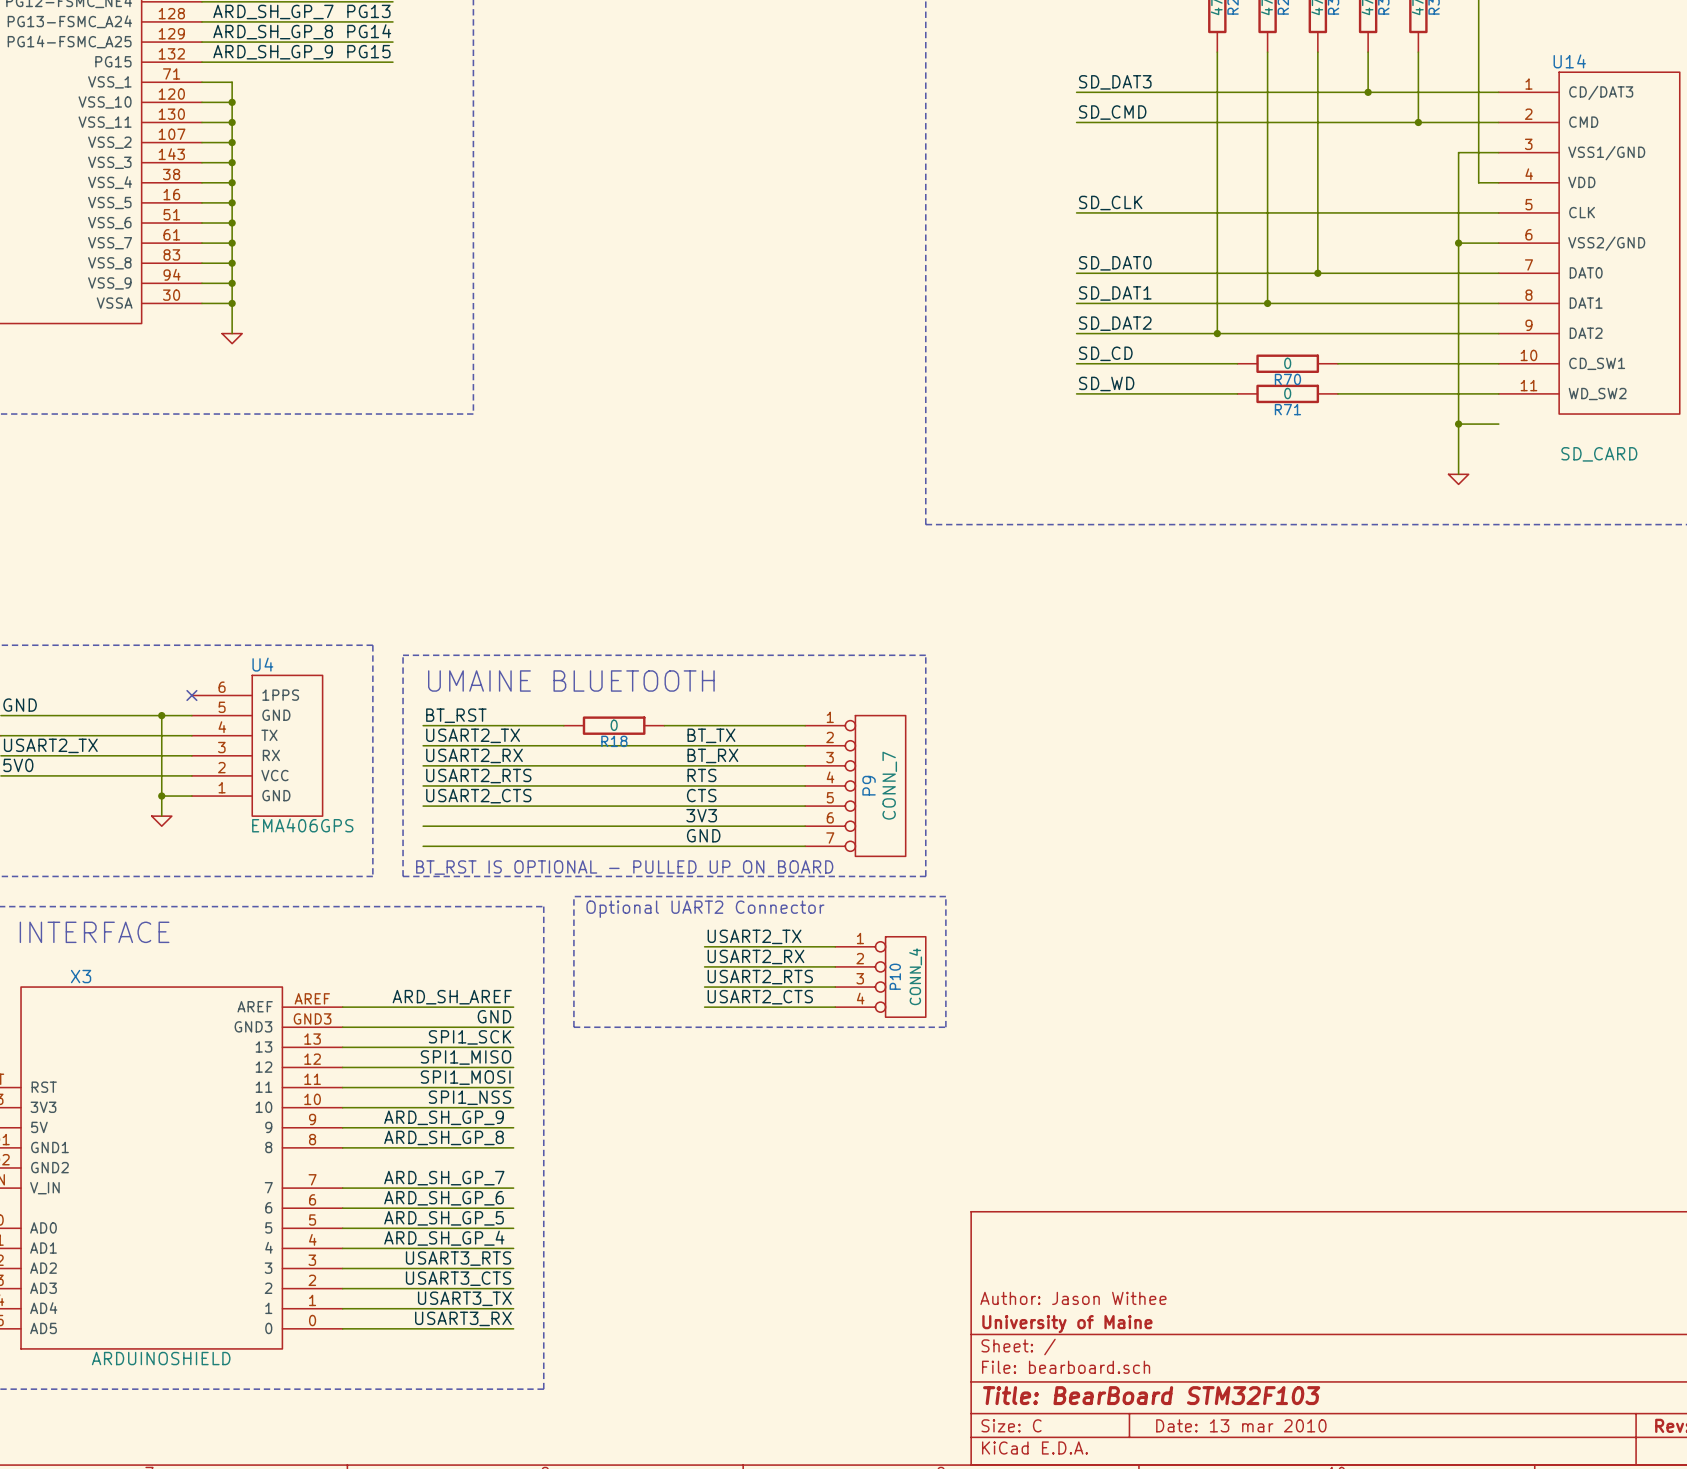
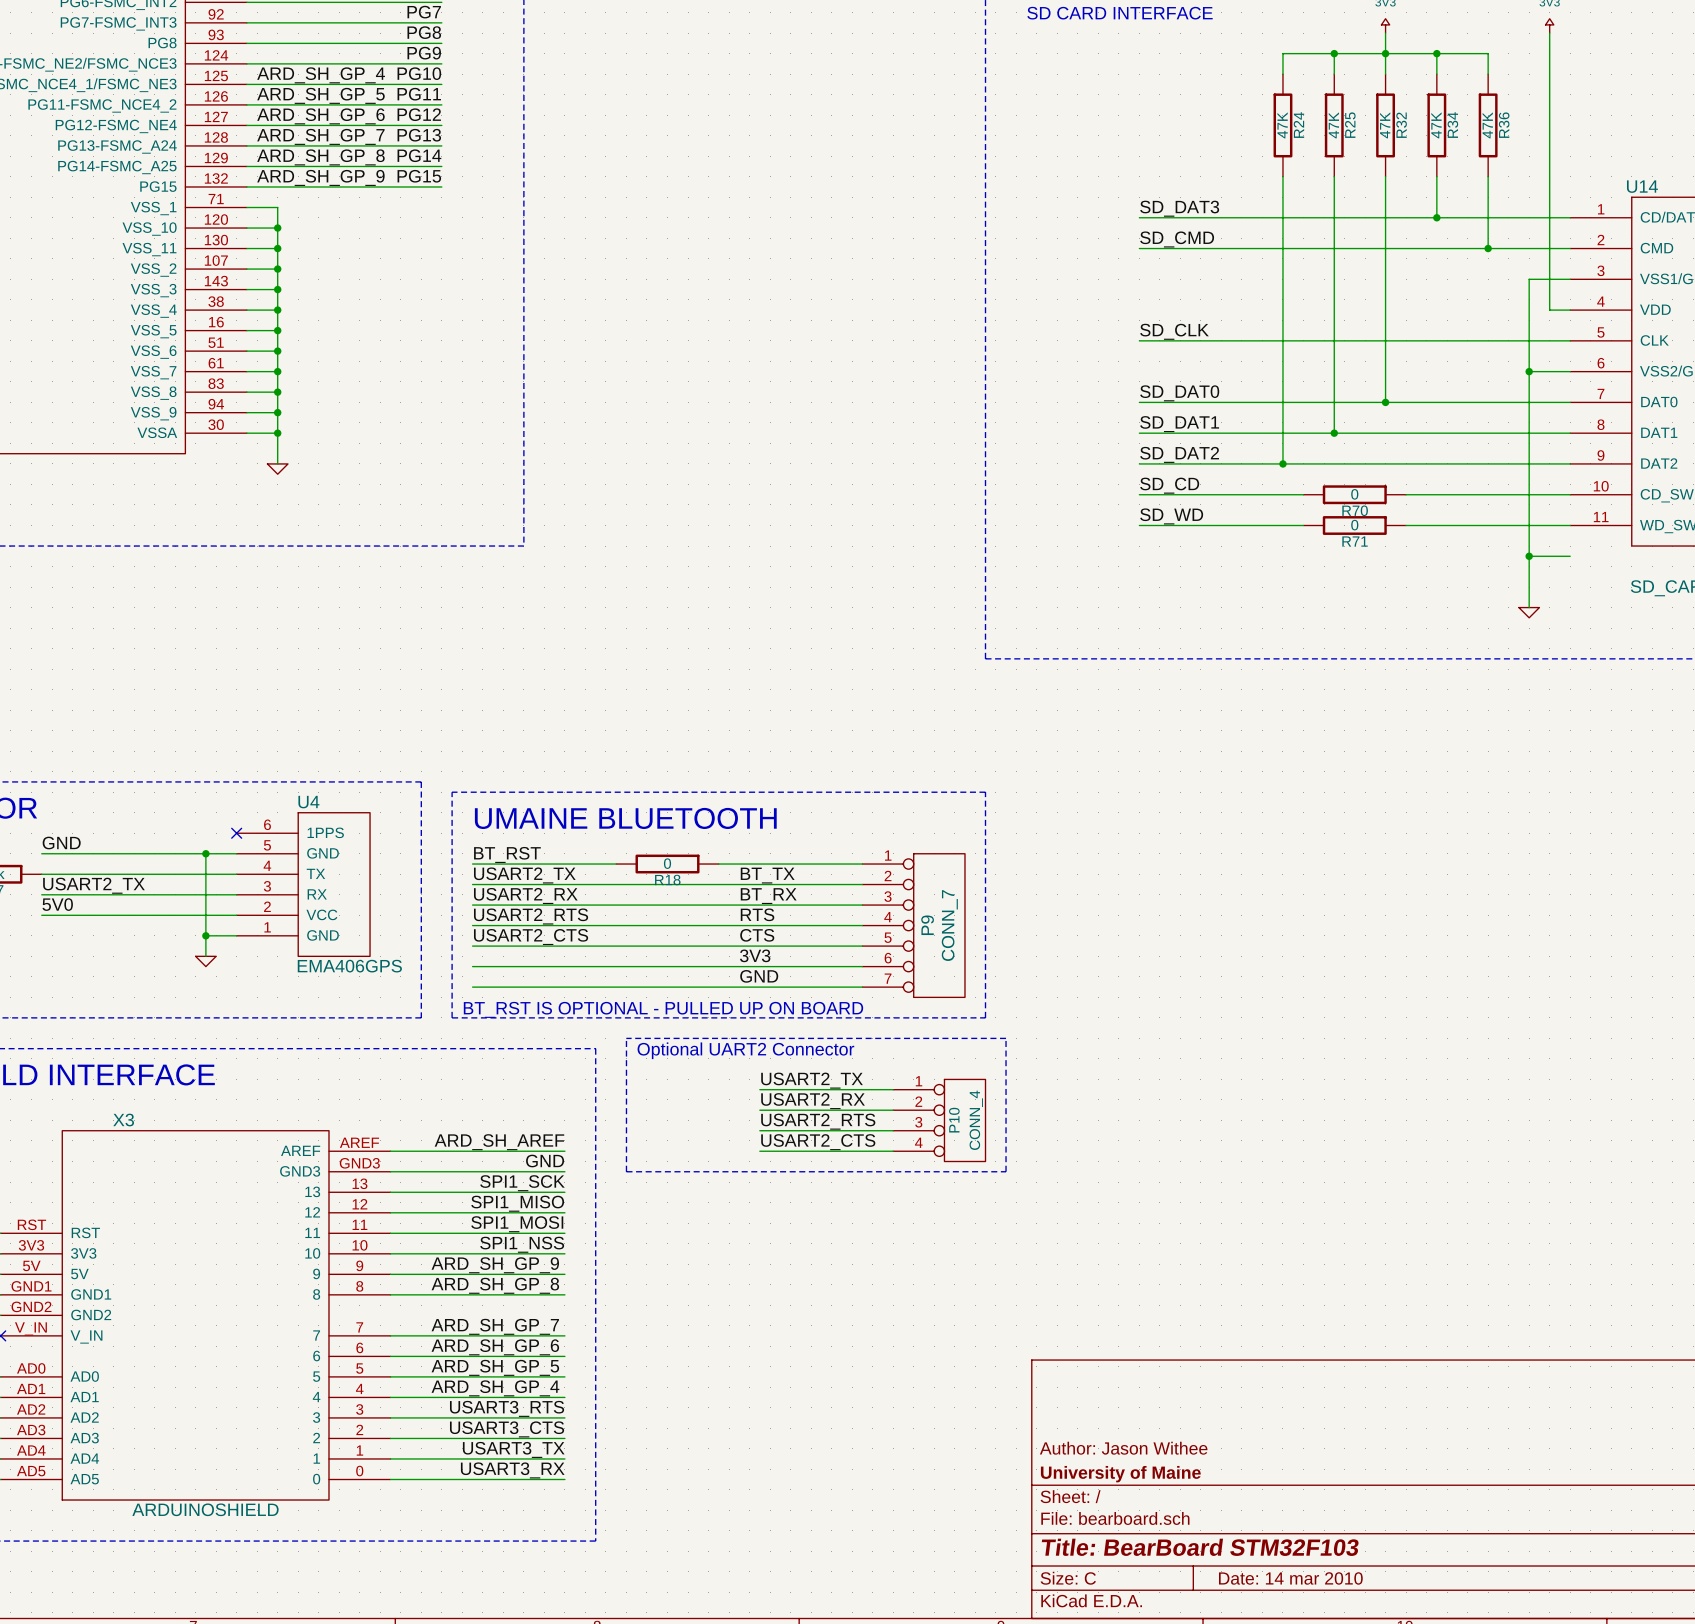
title block: Date: 13 mar 2010 (1241, 1425) -> Date: 14 mar 2010 (1290, 1578)

